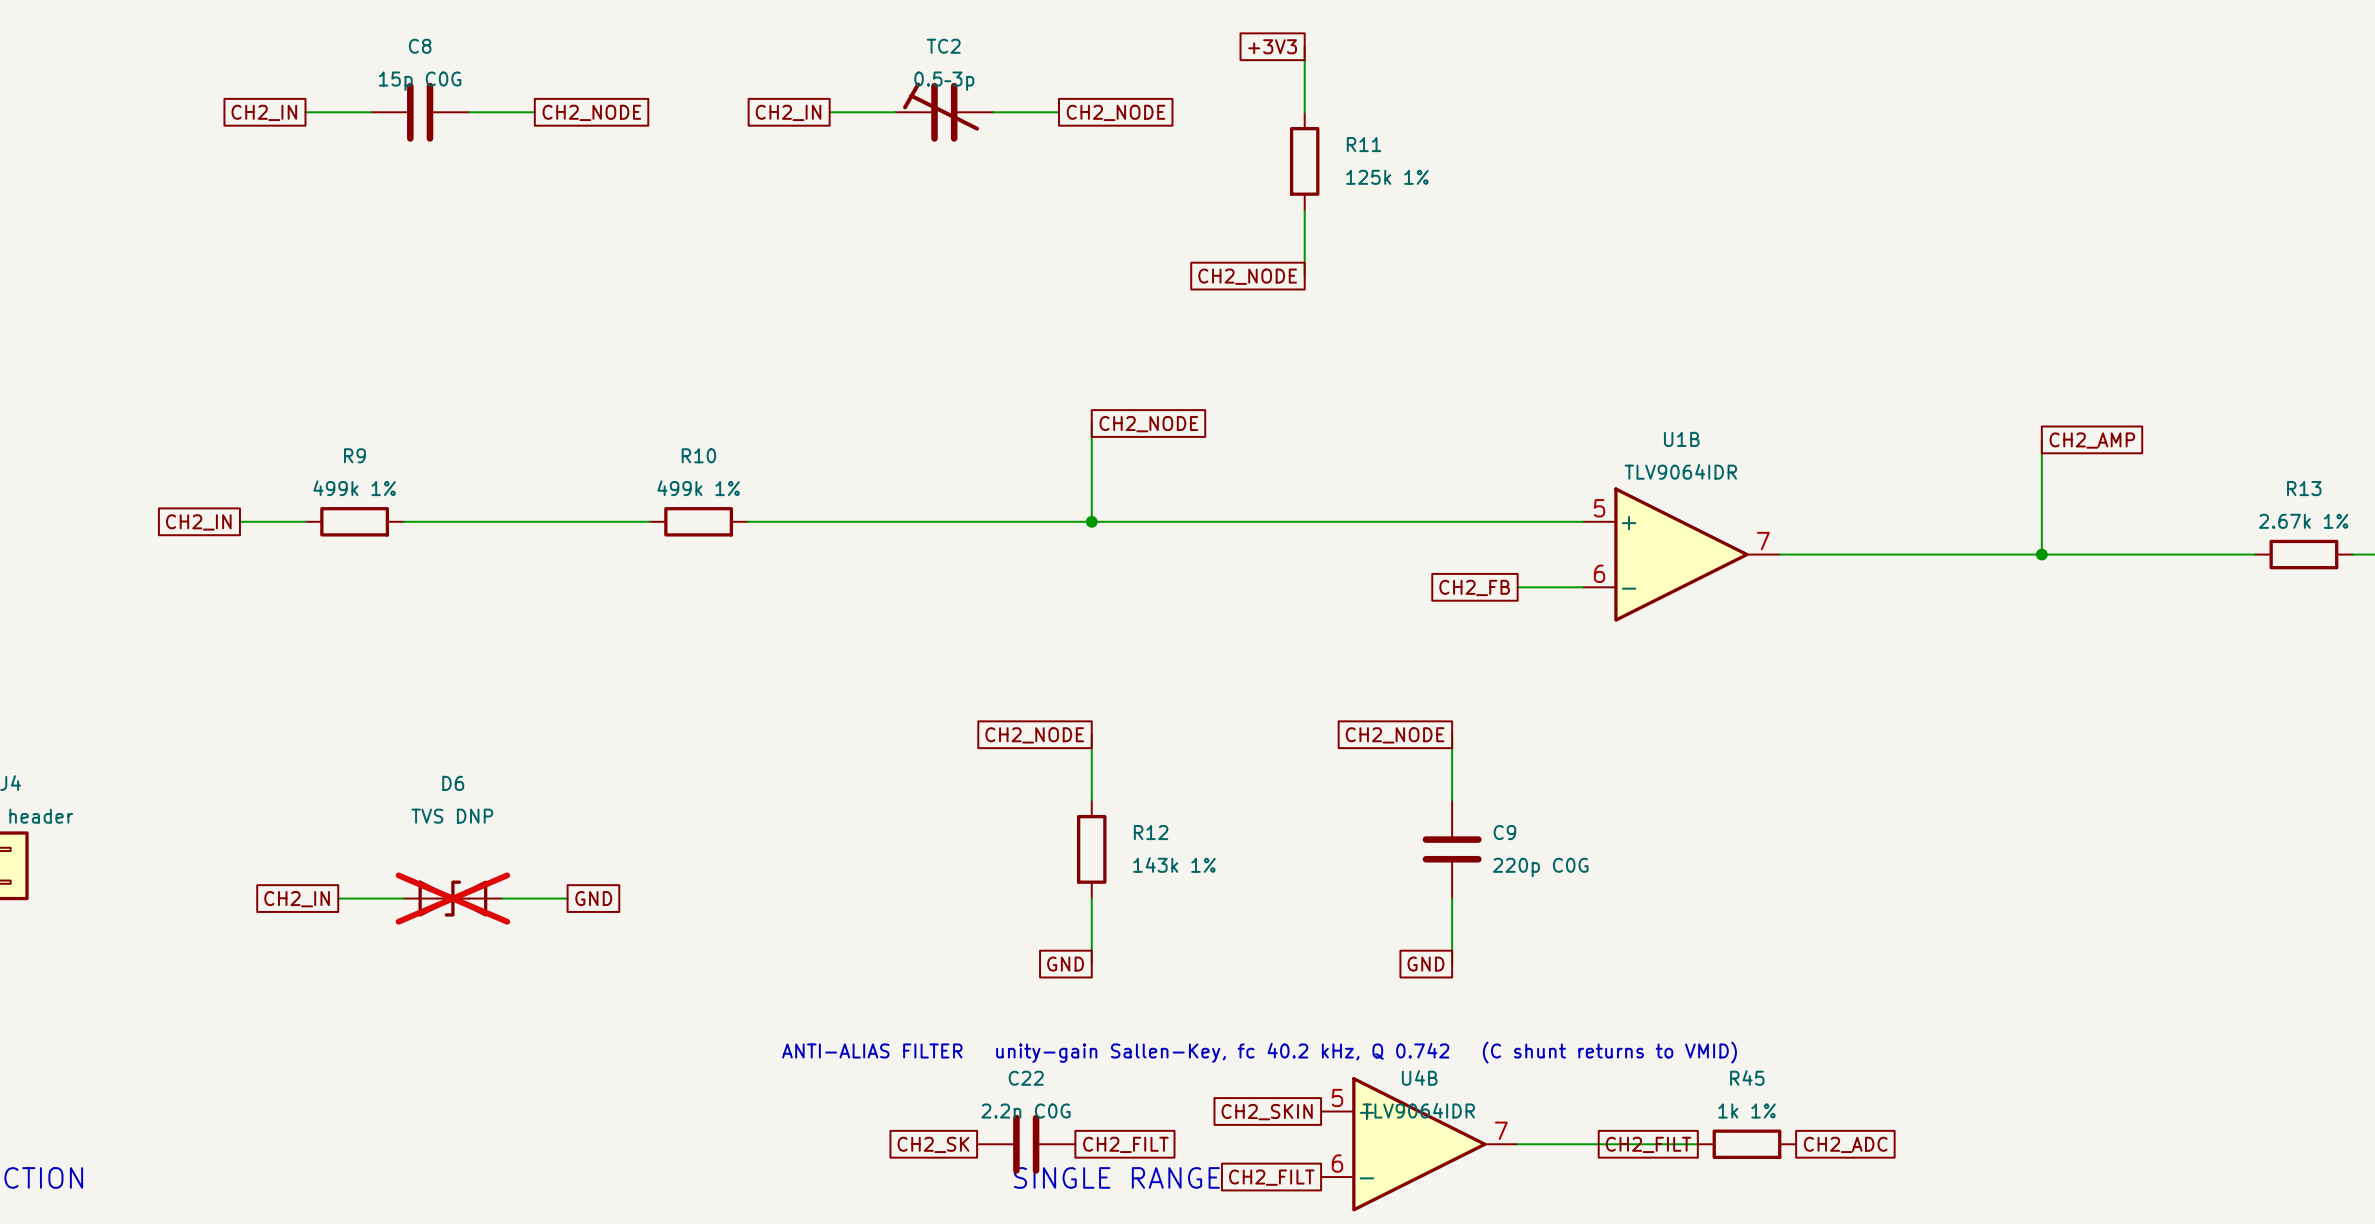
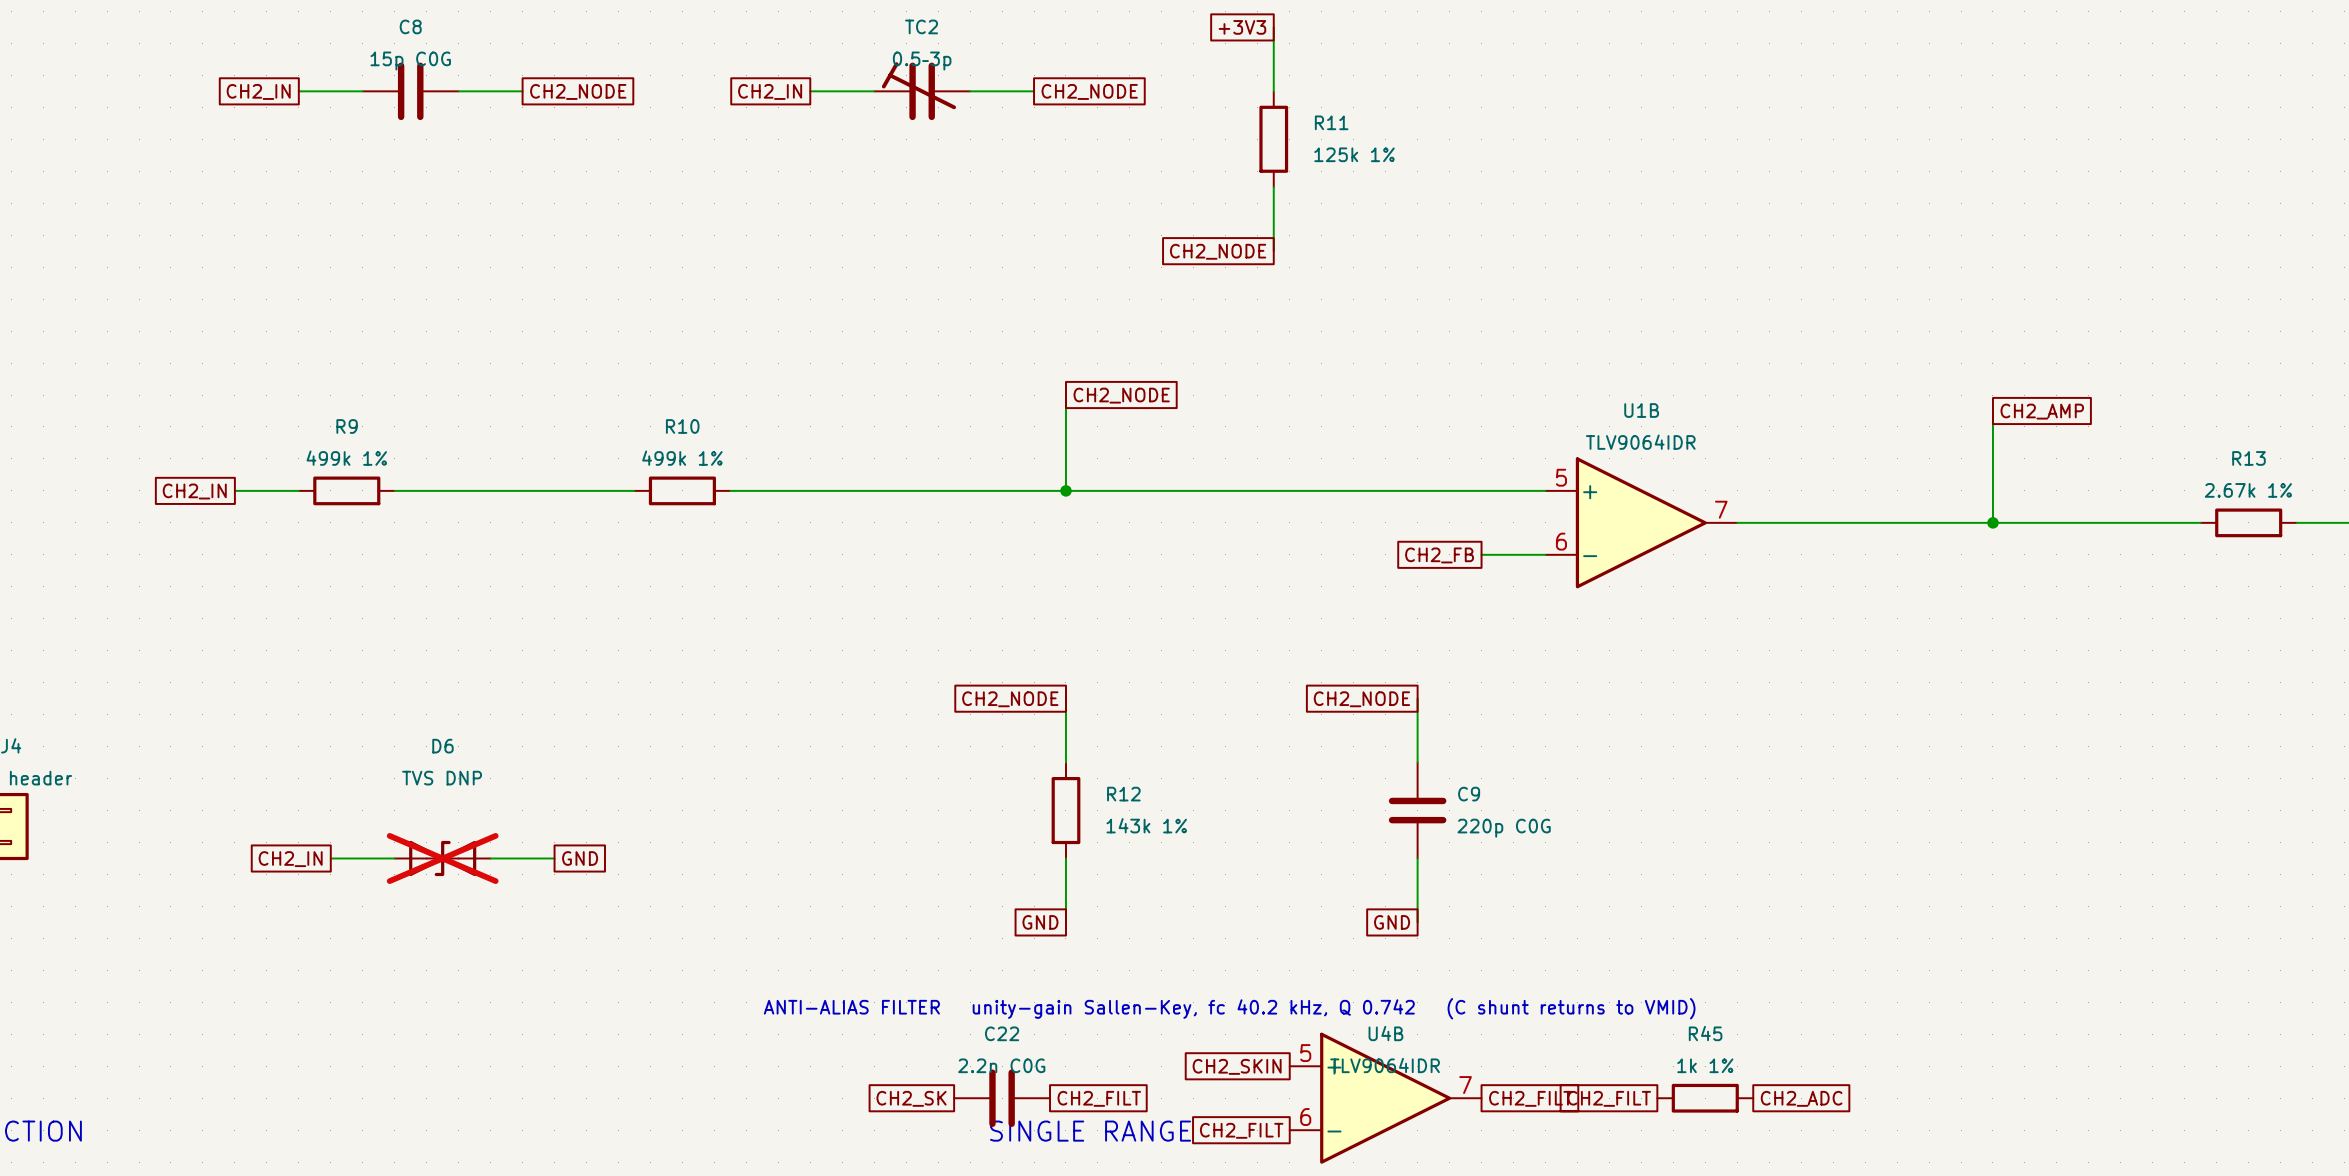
wire: (1517, 1144) (1697, 1144) -> none
global label: none -> CH2_FILT (1530, 1098)

